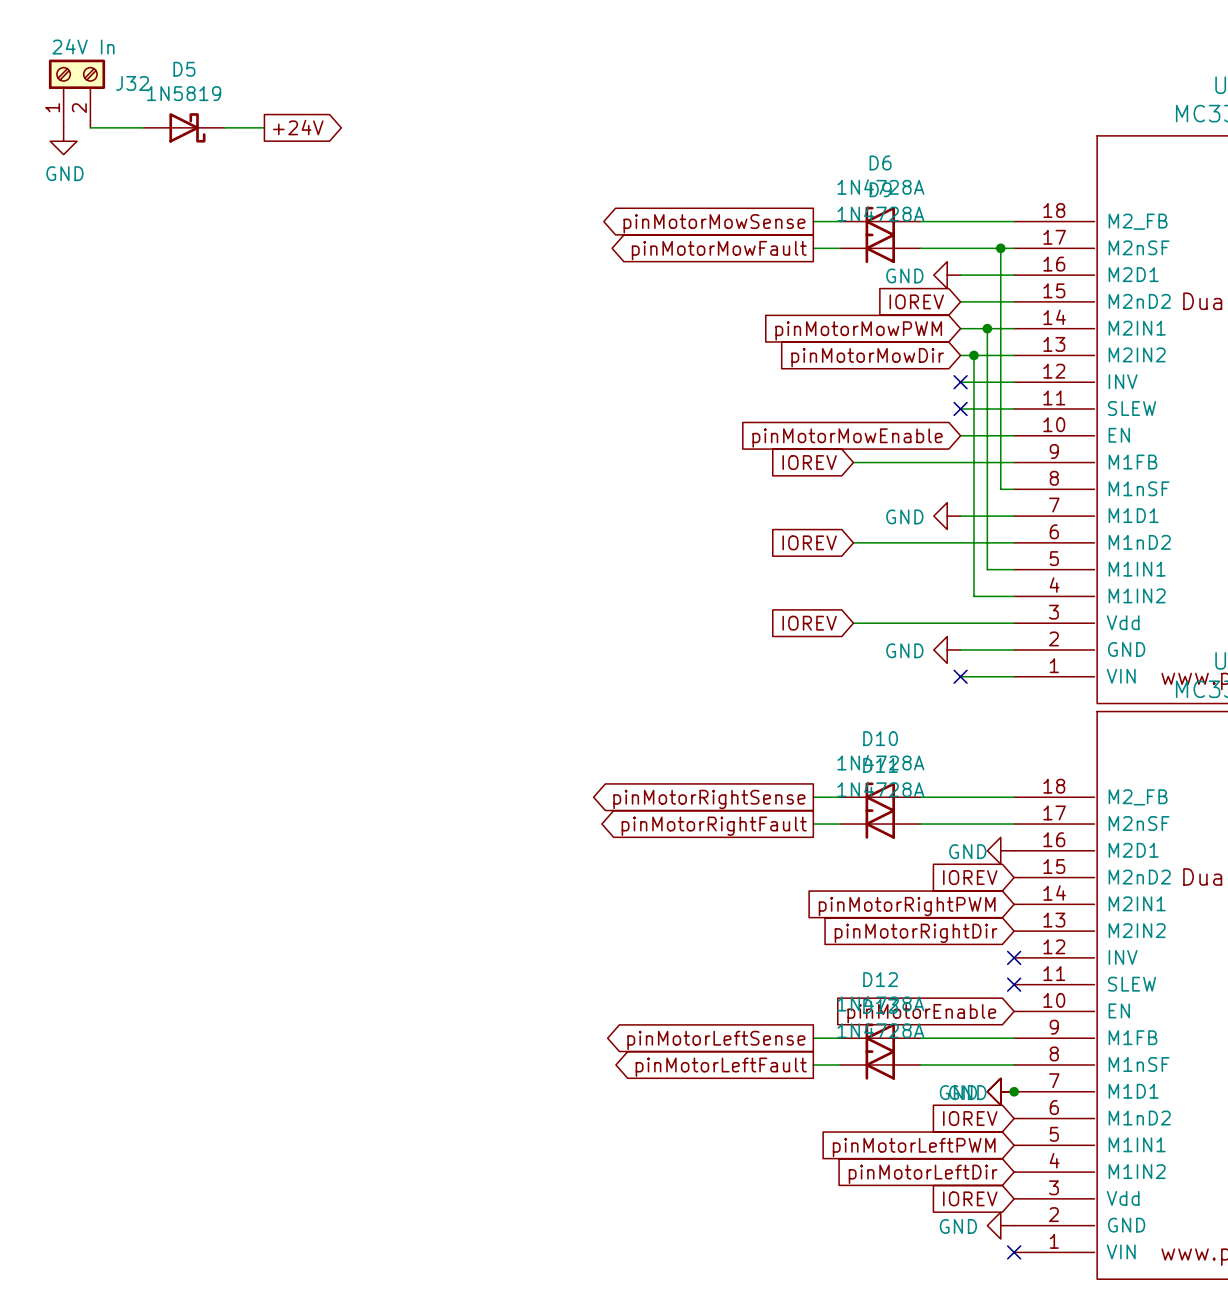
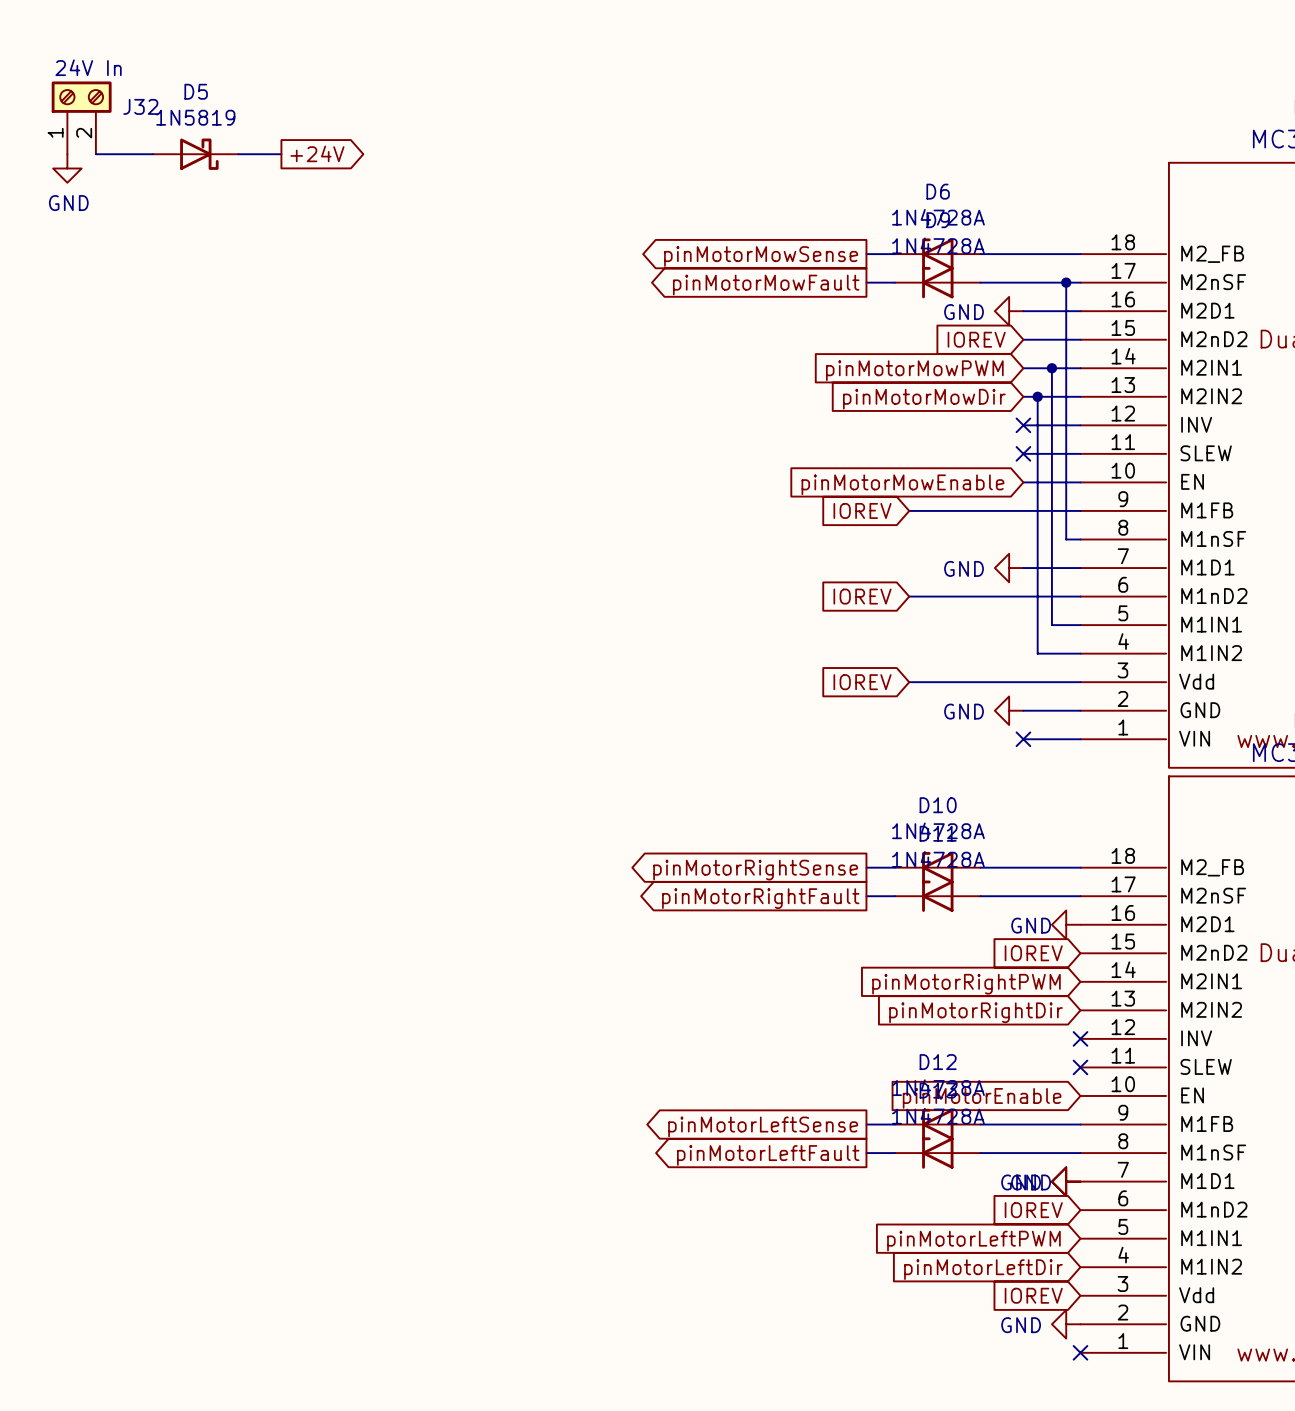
junction: (1014, 1091) -> none

